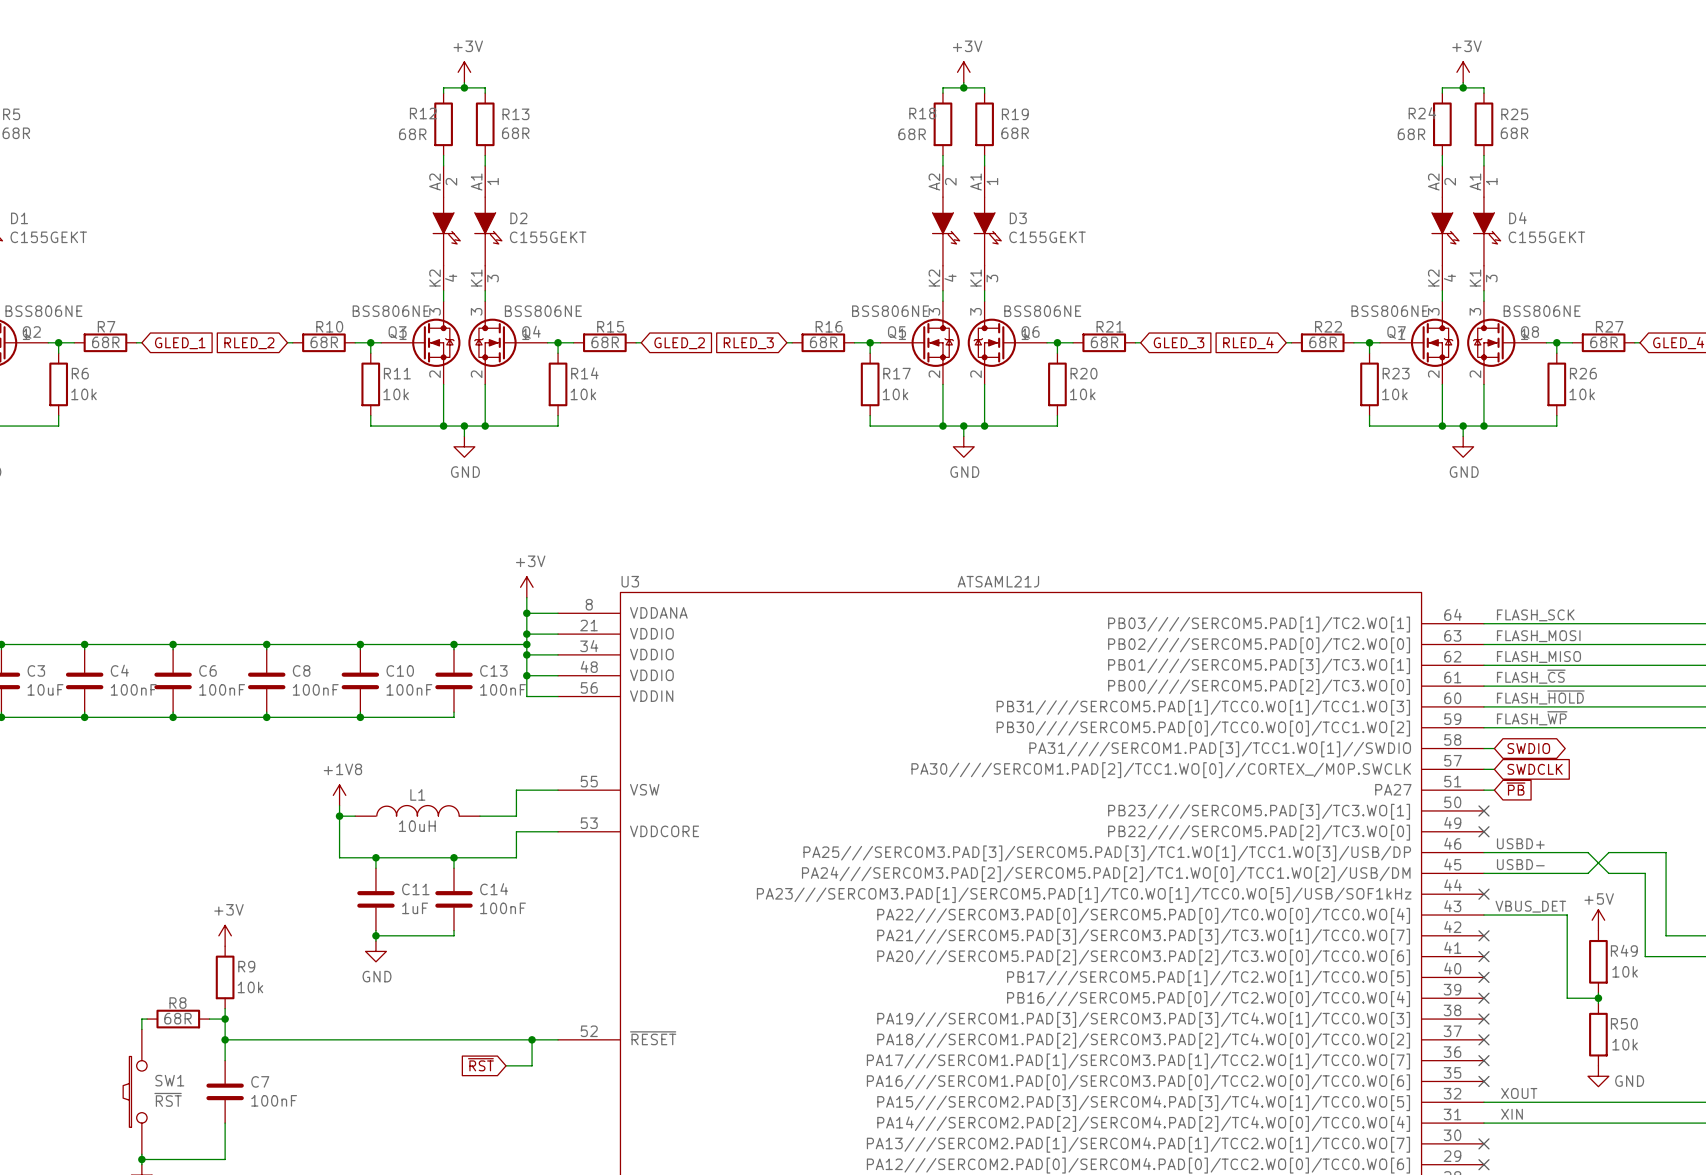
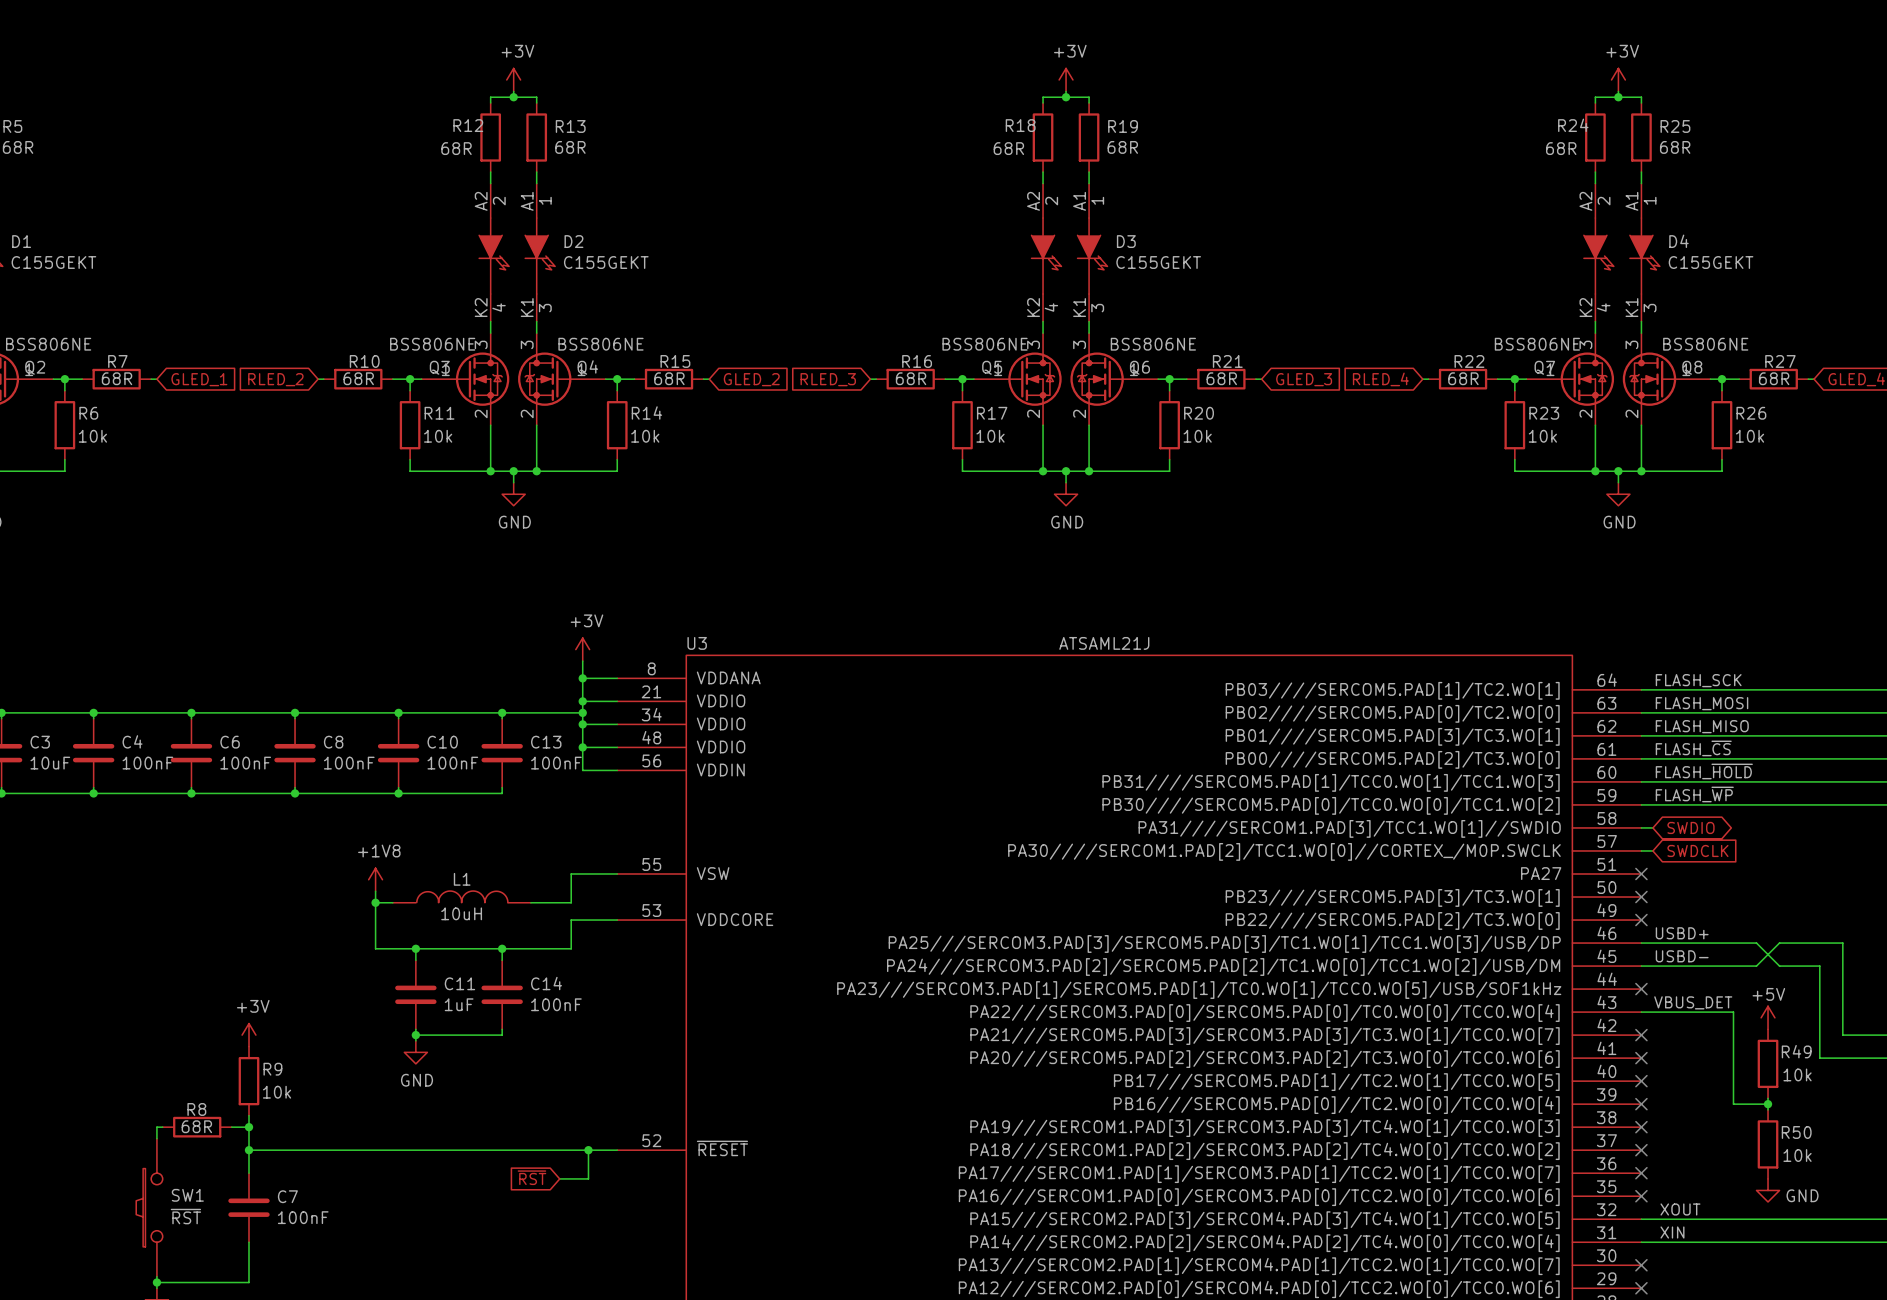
global label: ~{PB} (1515, 789) -> none
wire: (1483, 790) (1494, 790) -> none
no-connect mark: none -> (1641, 874)

